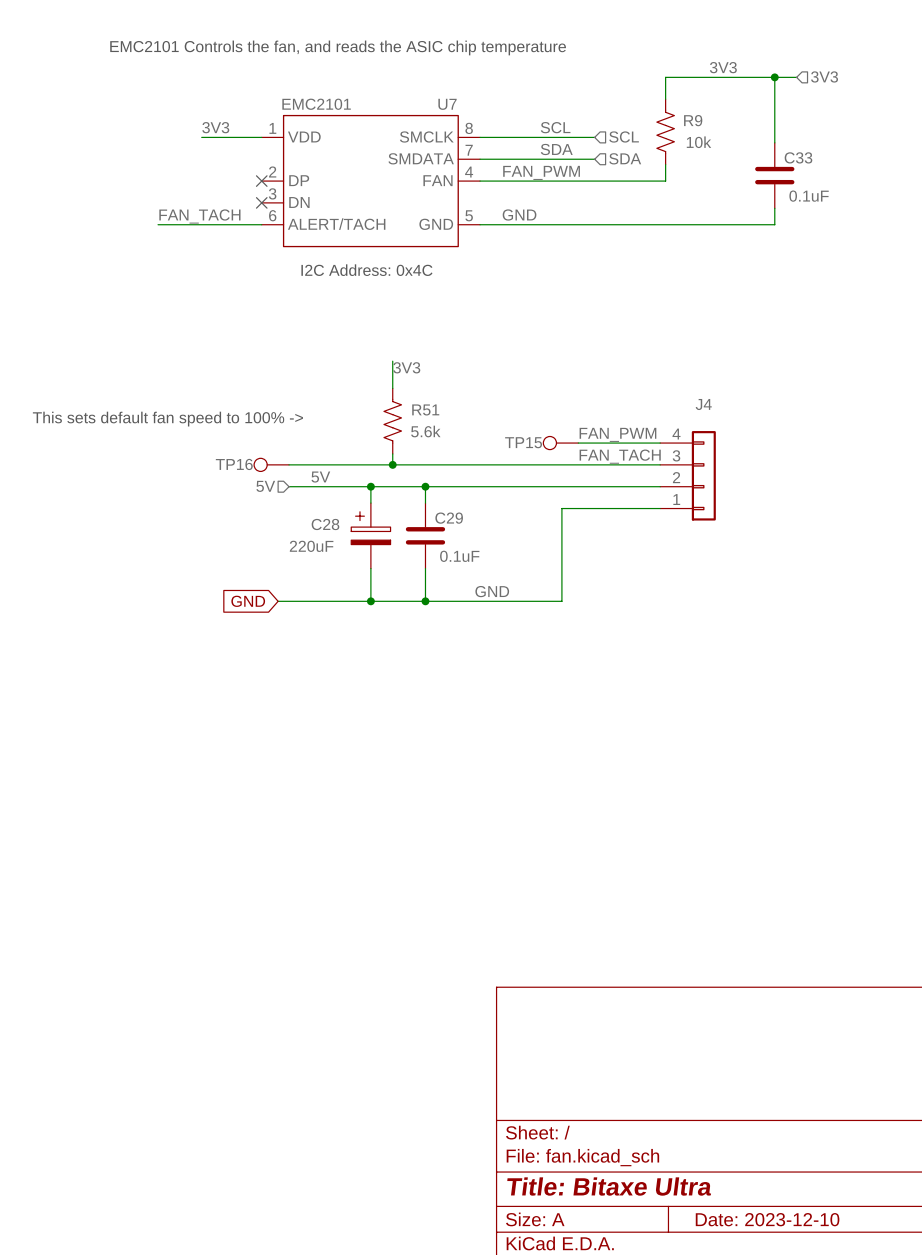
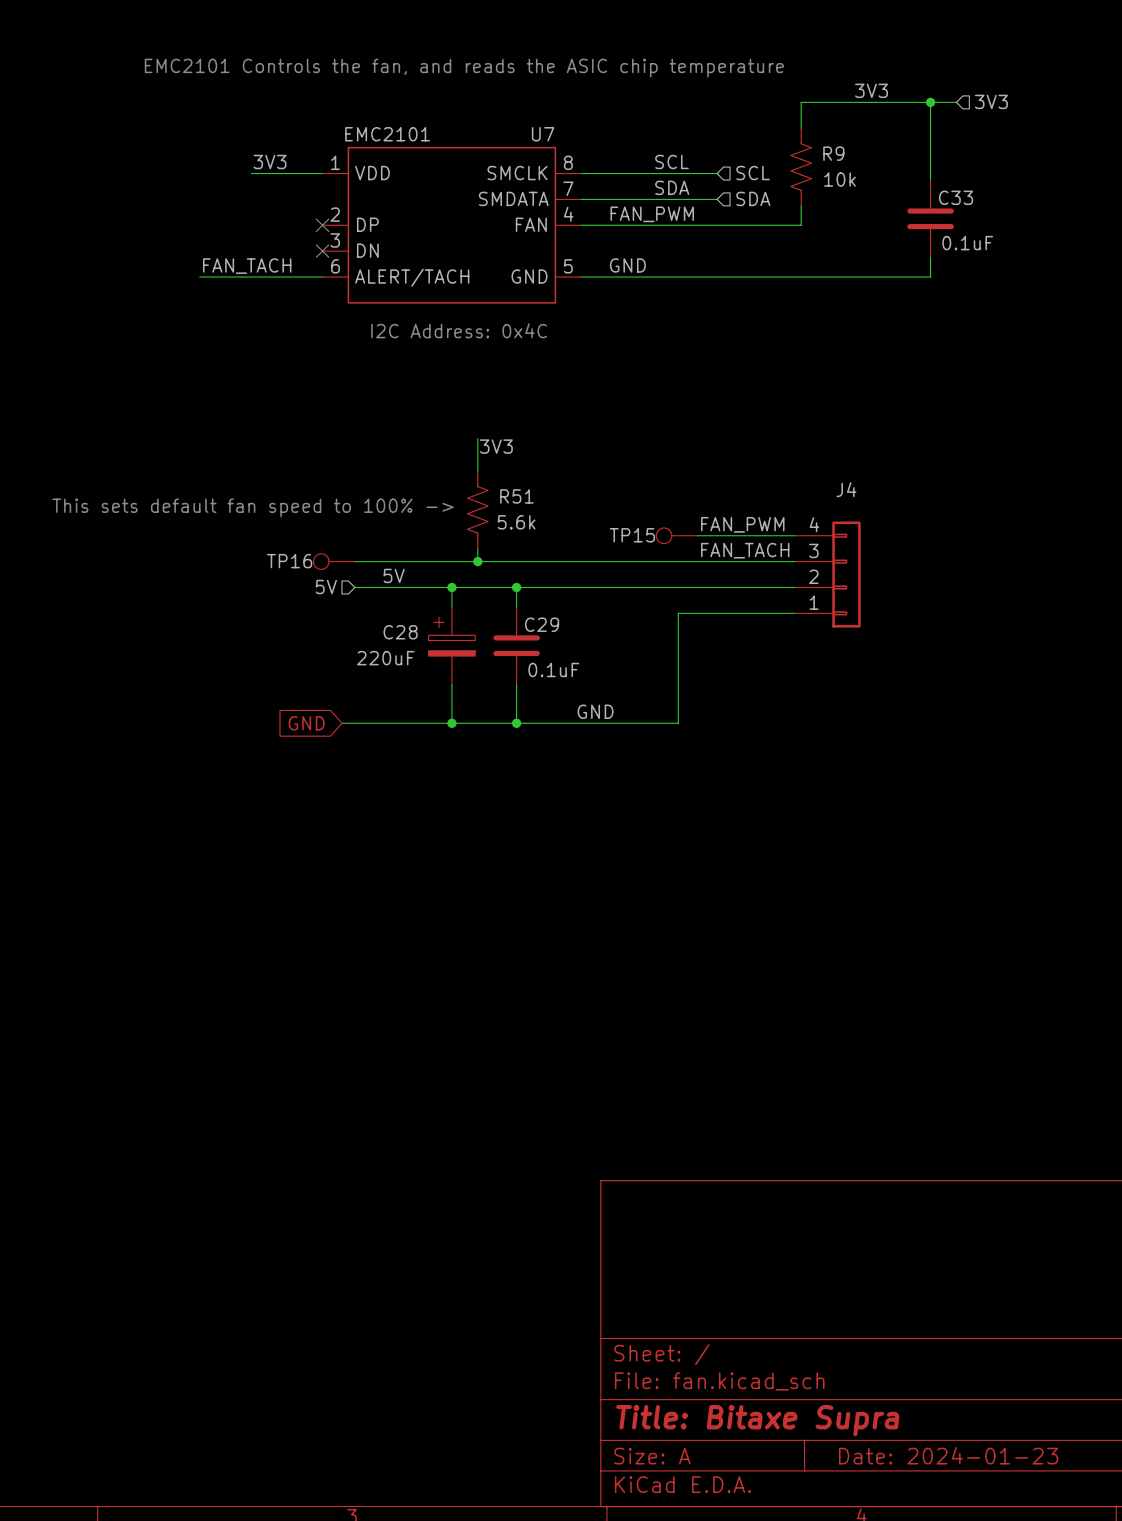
title block: Title: Bitaxe Ultra (609, 1186) -> Title: Bitaxe Supra (757, 1420)
title block: Date: 2023-12-10 (767, 1219) -> Date: 2024-01-23 (948, 1455)

